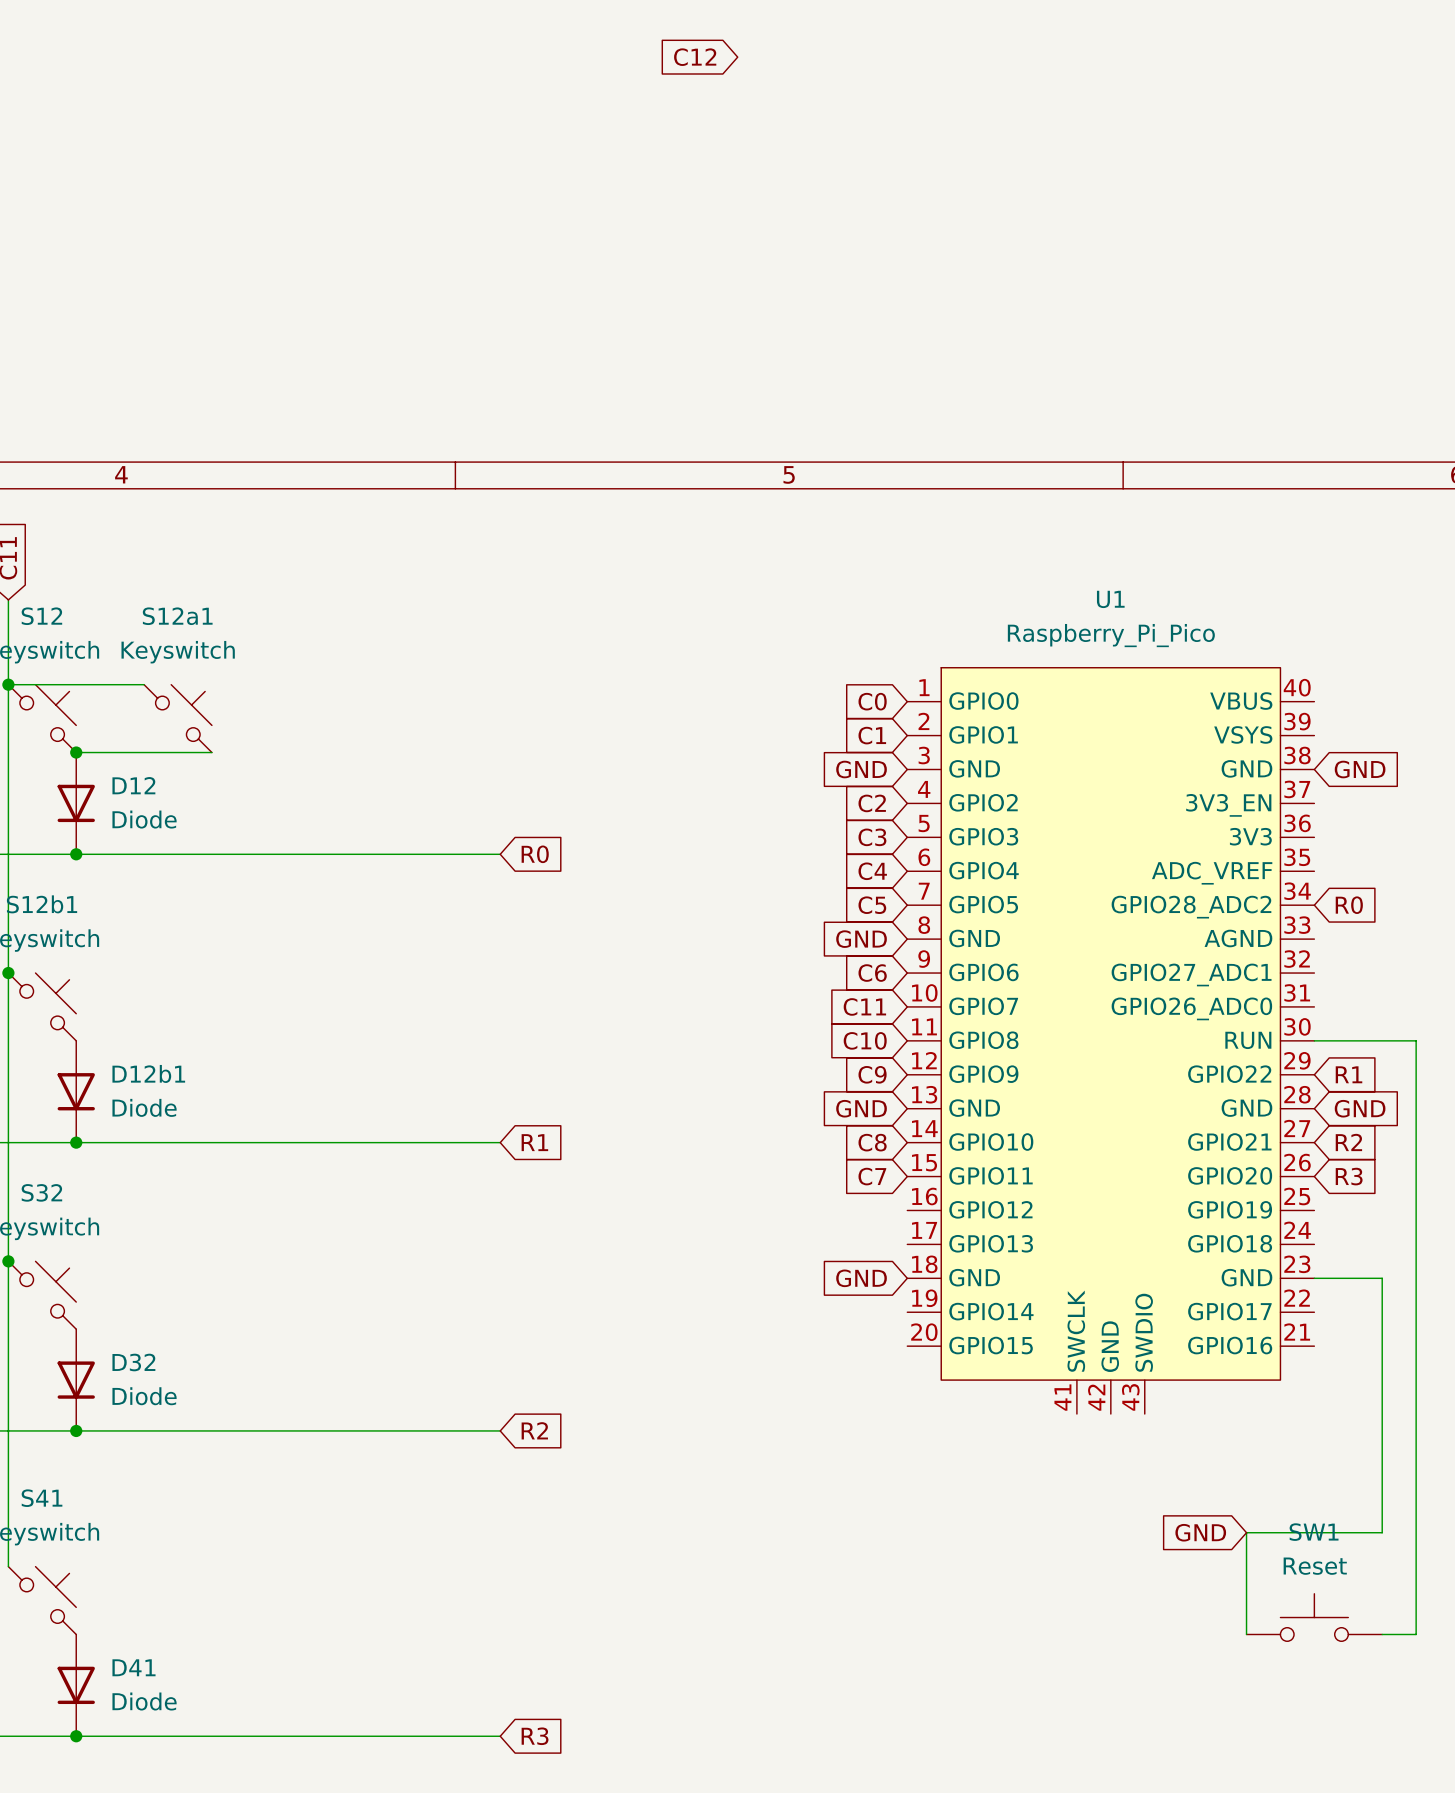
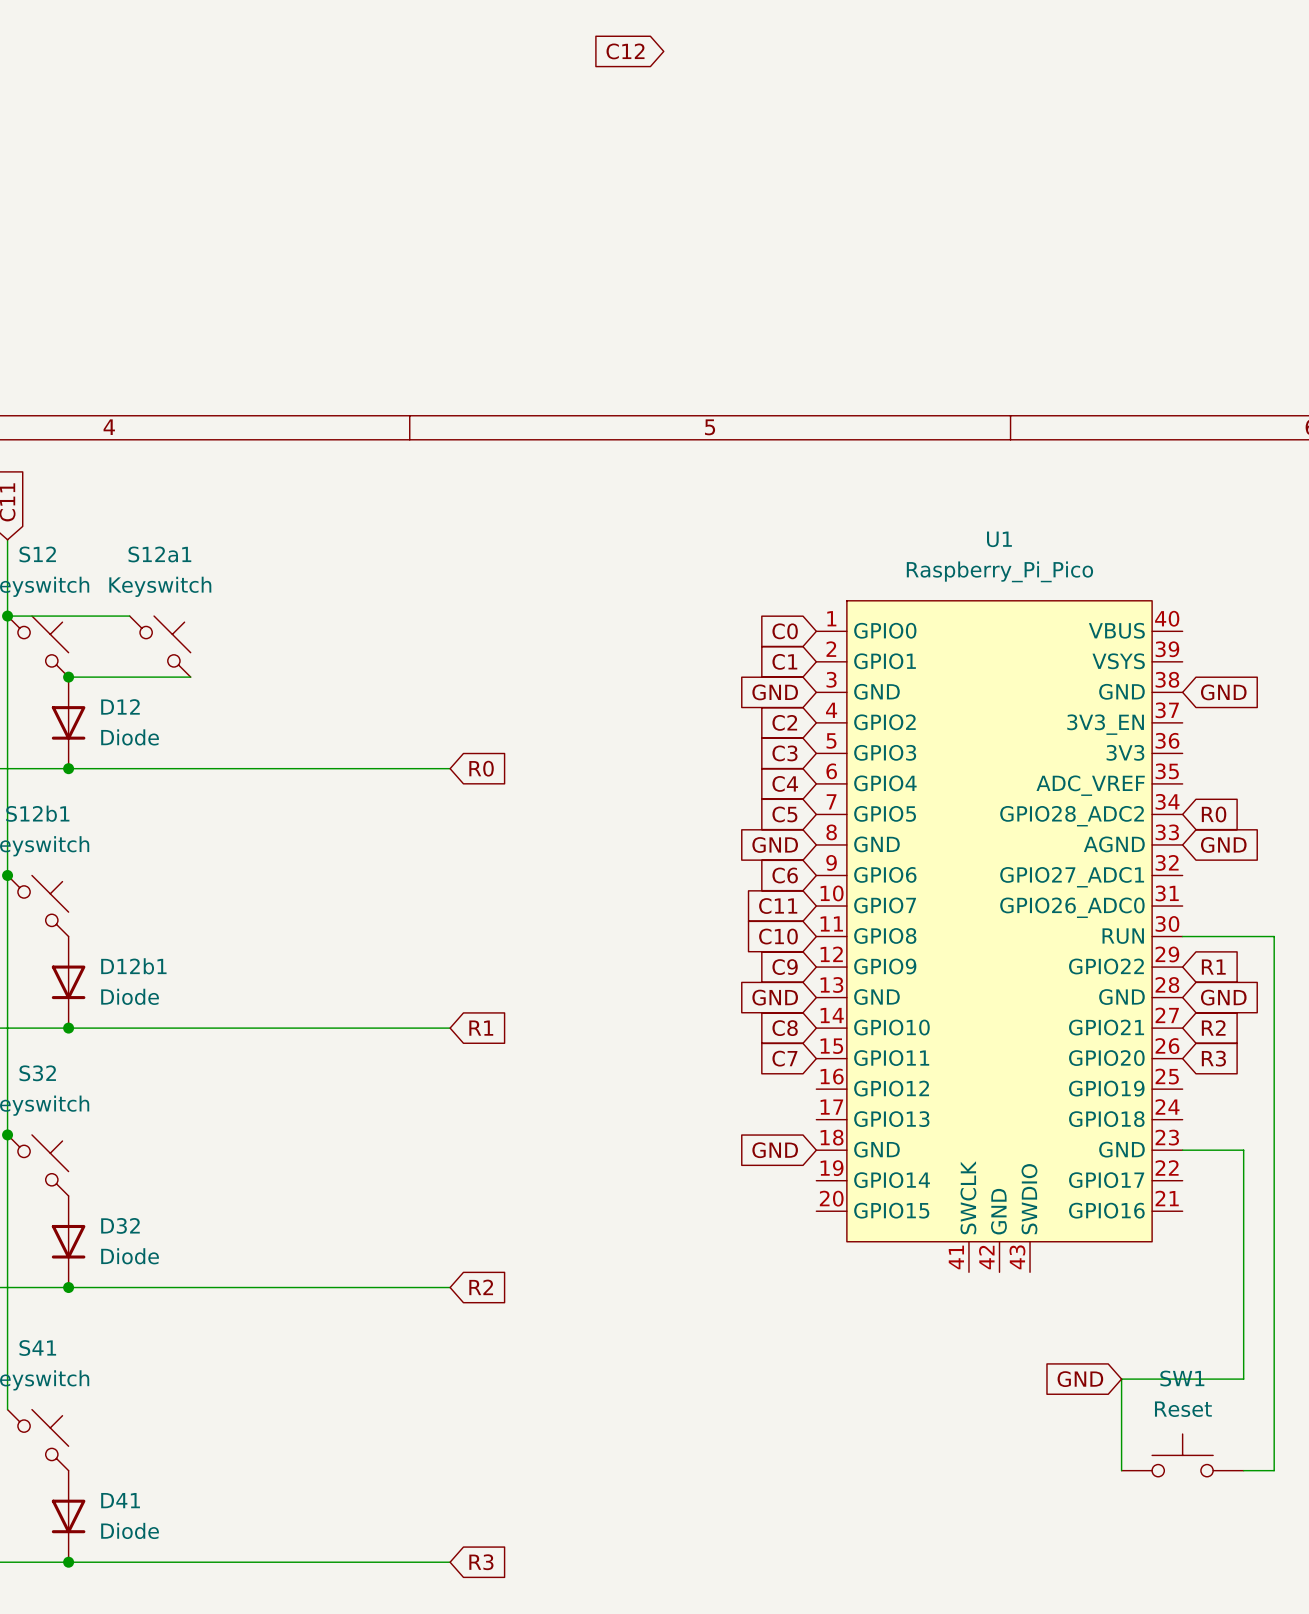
global label: none -> GND (1223, 844)

